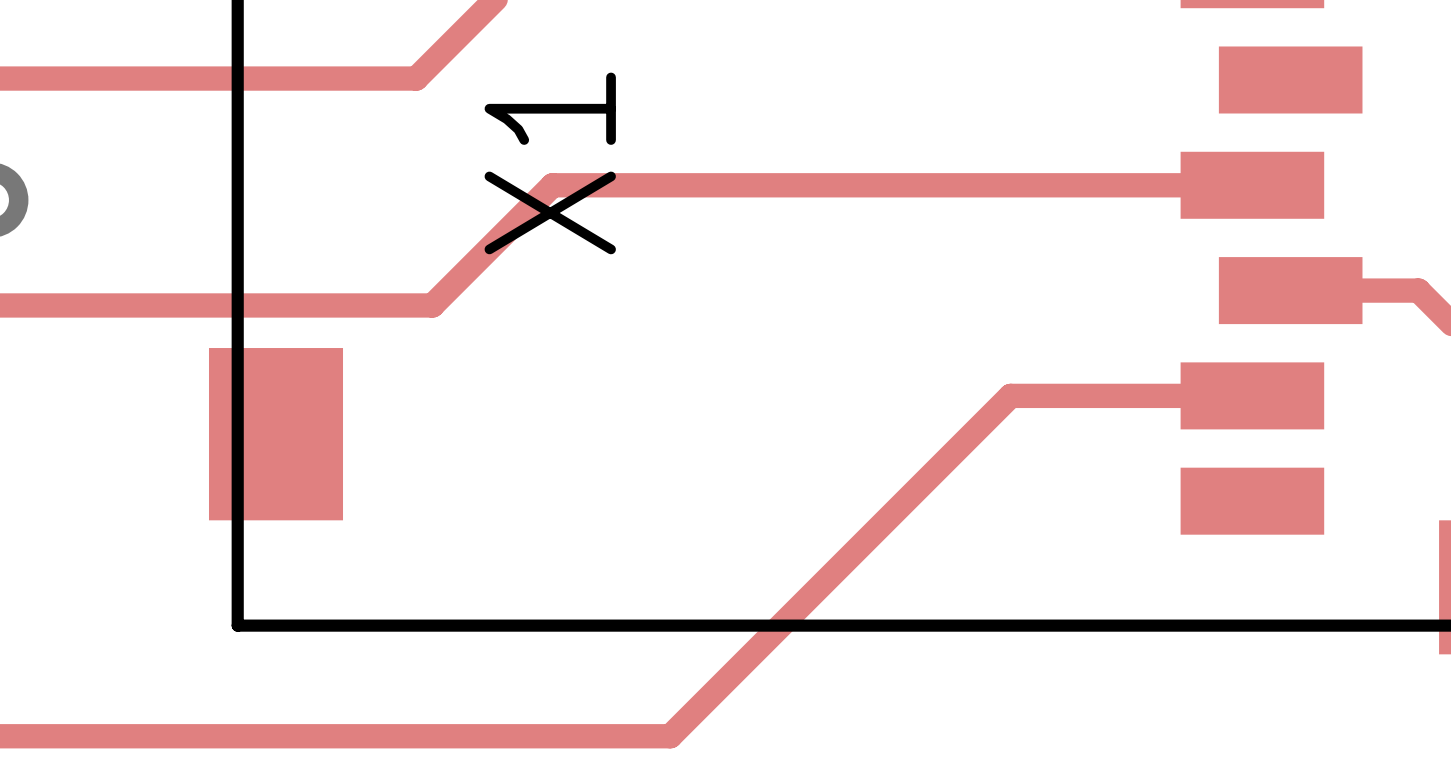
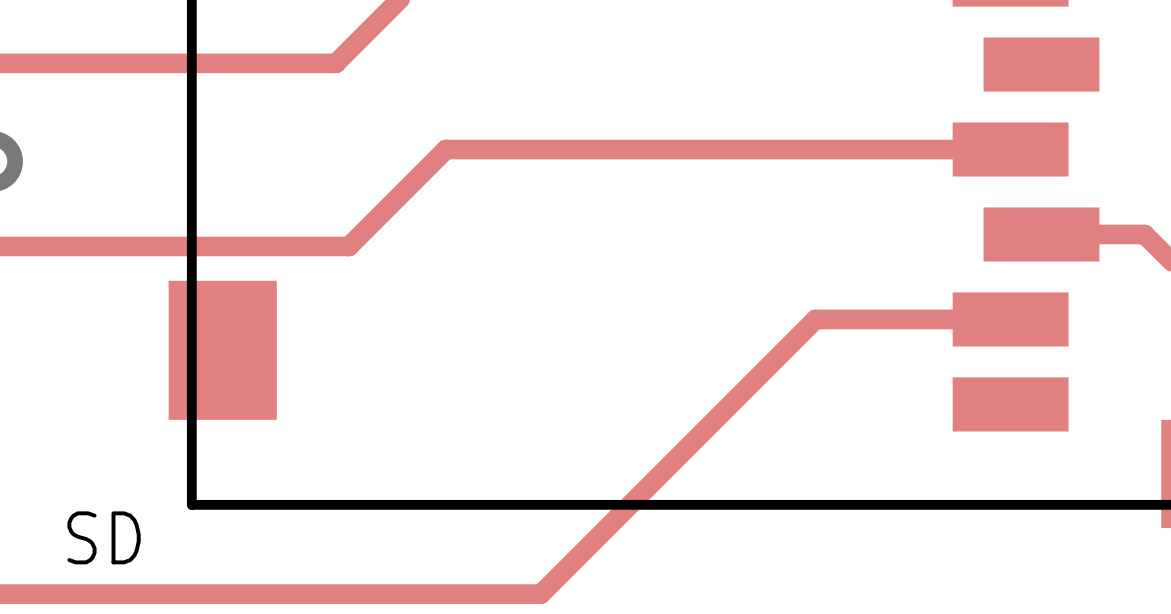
X1 name: X1 (550, 163) -> SD (104, 537)

